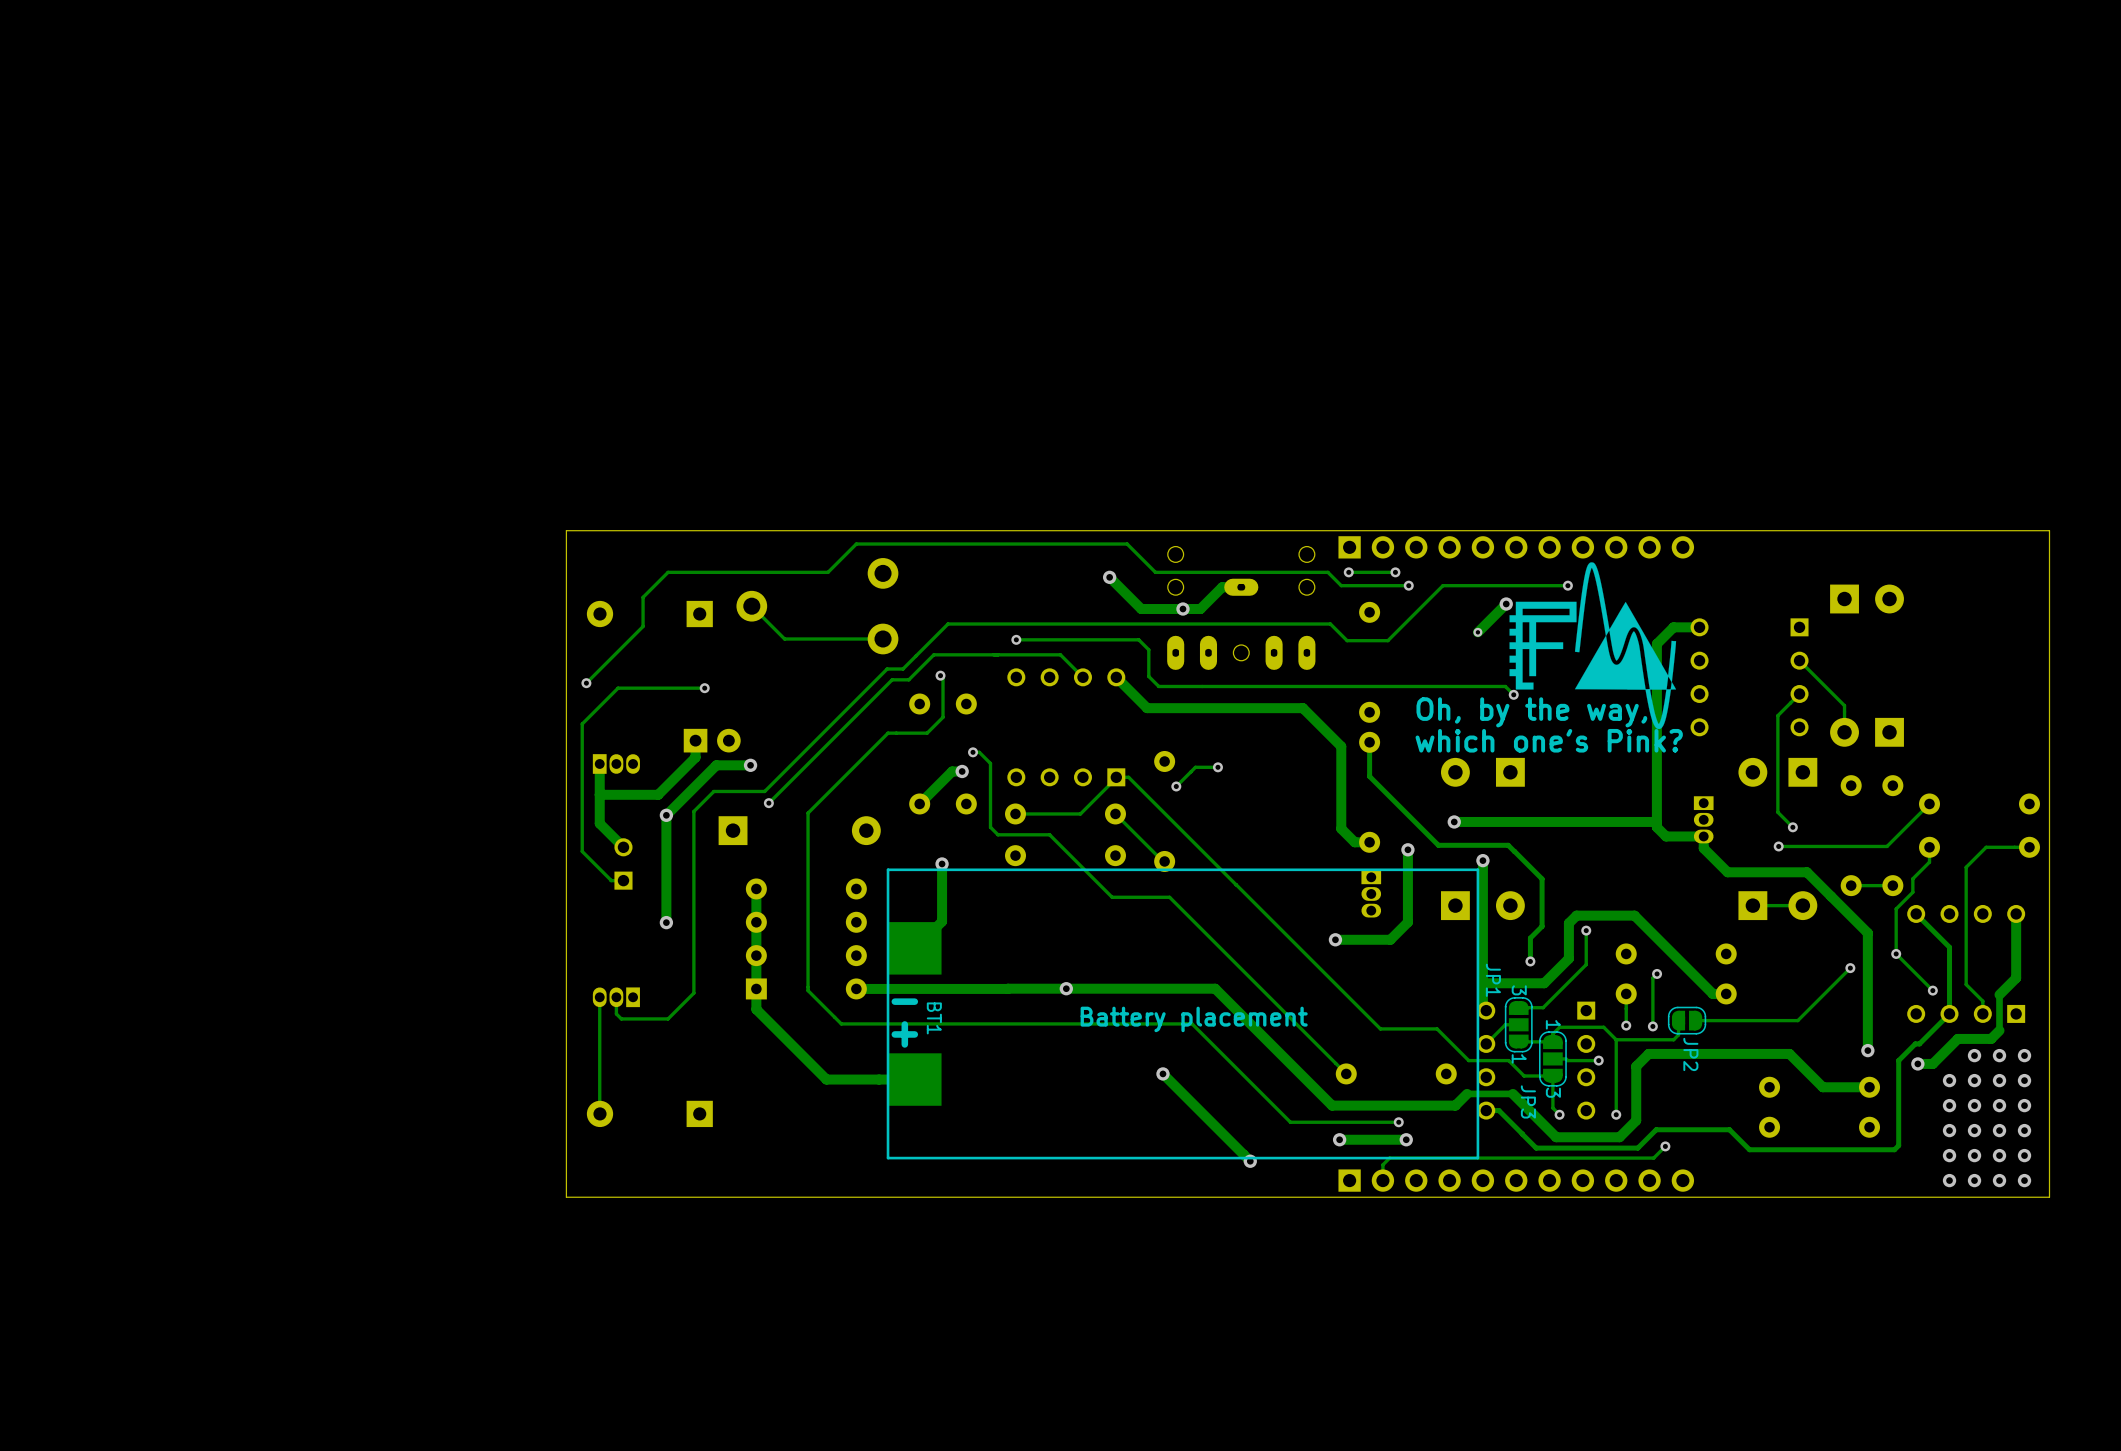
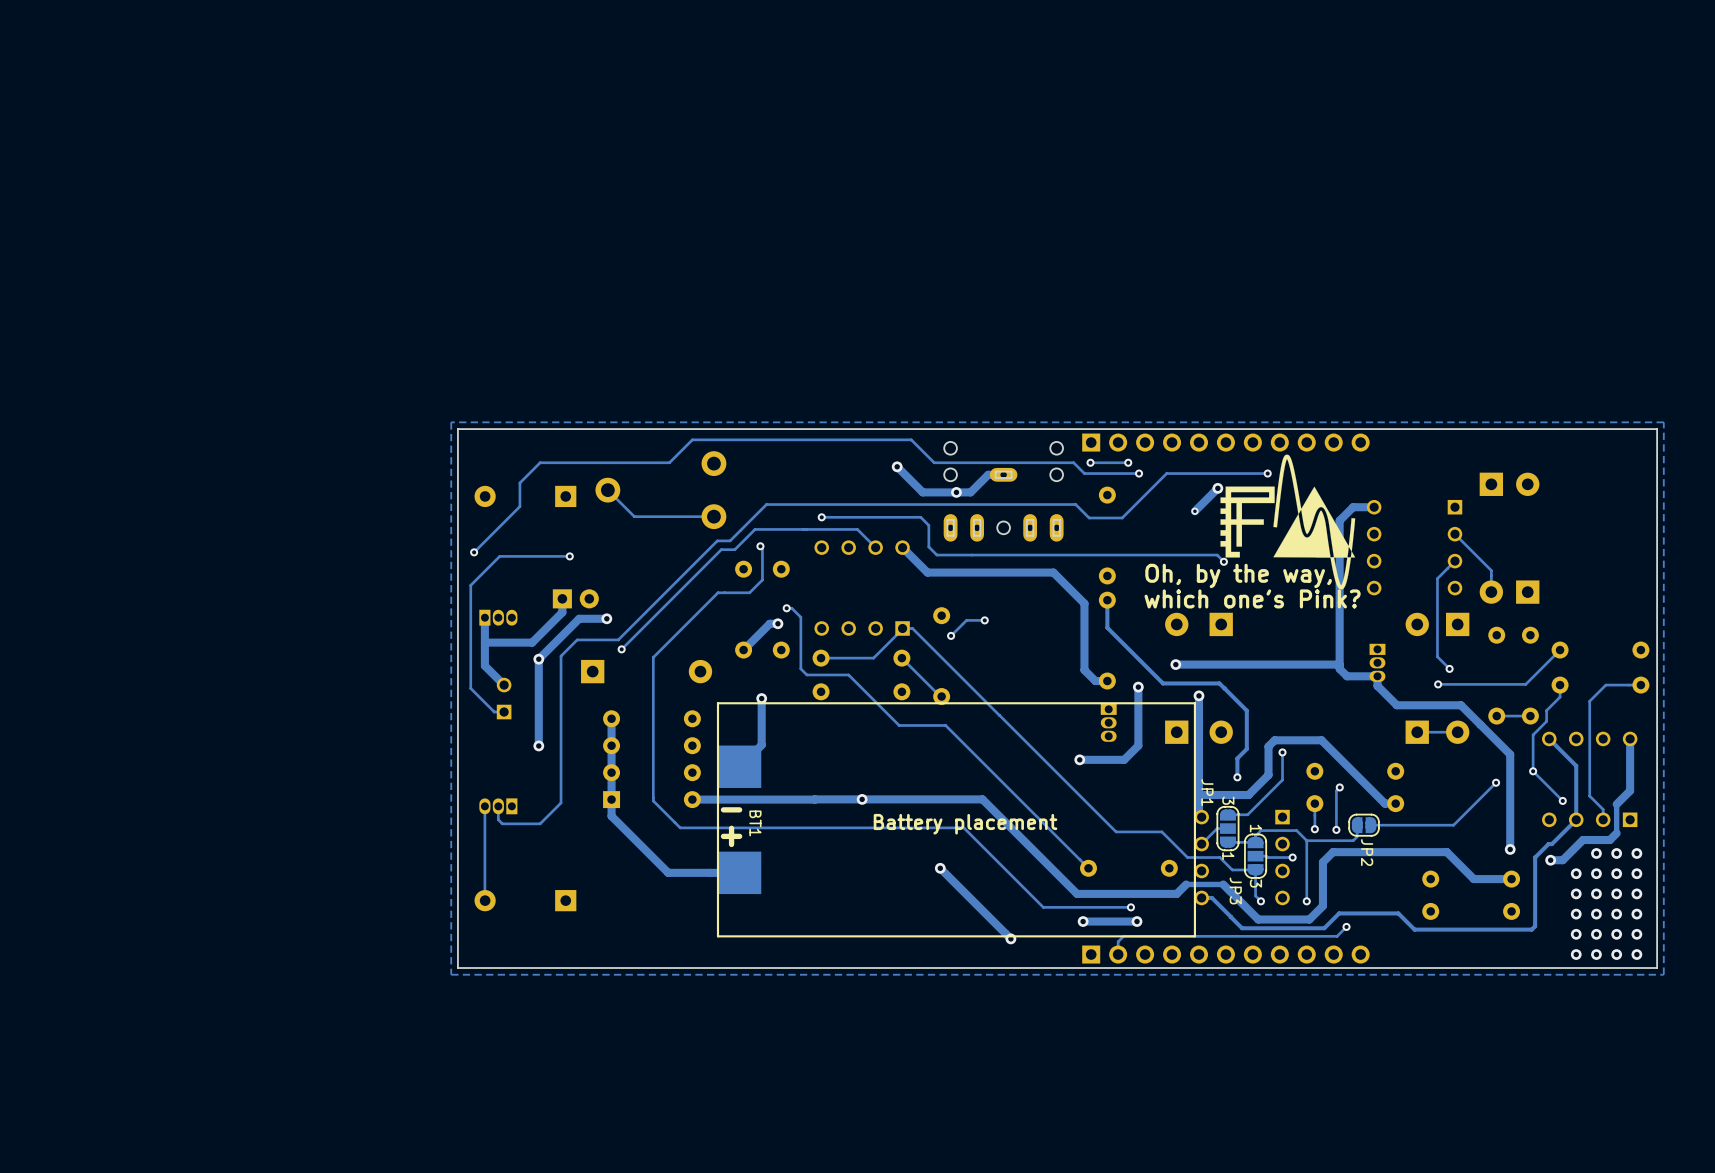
zone outline: none -> (1663, 422) (1663, 974) (451, 974) (451, 422) (1663, 422)

